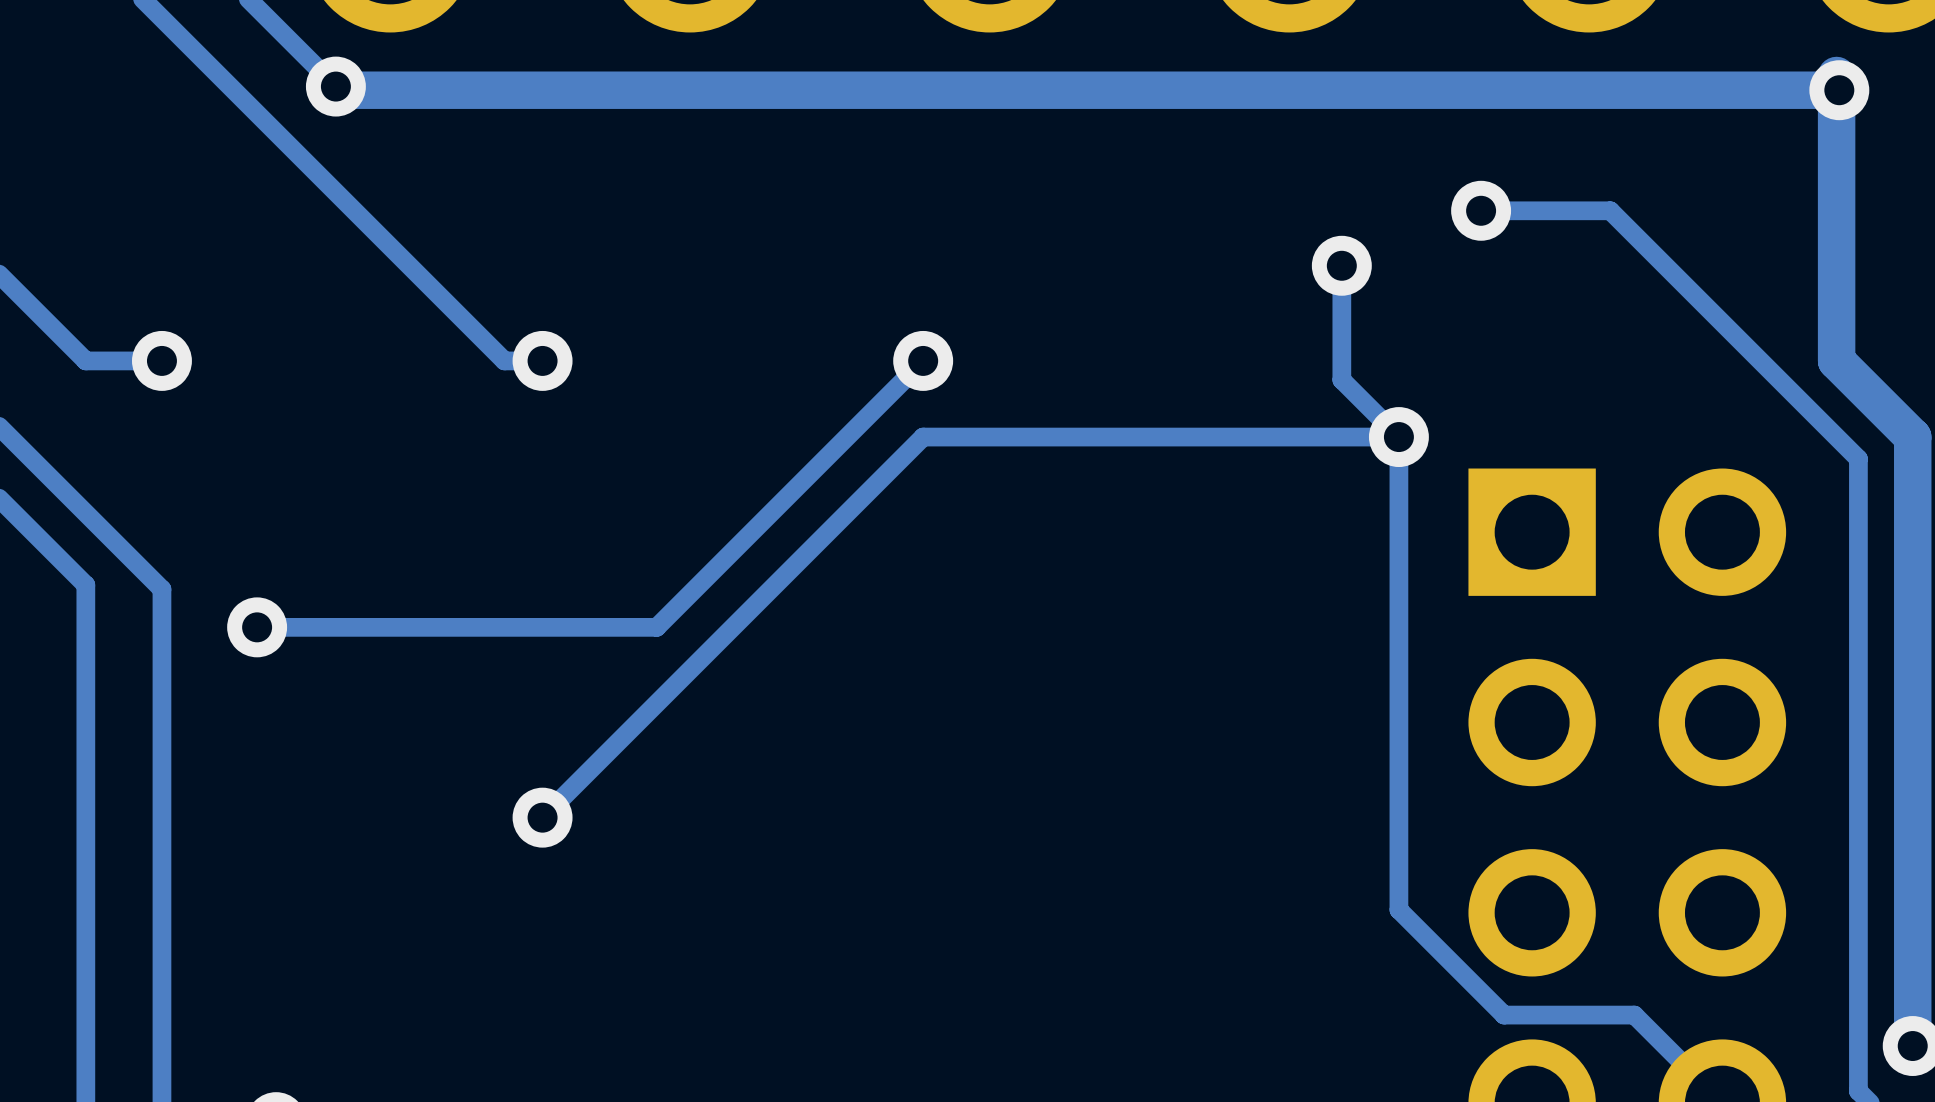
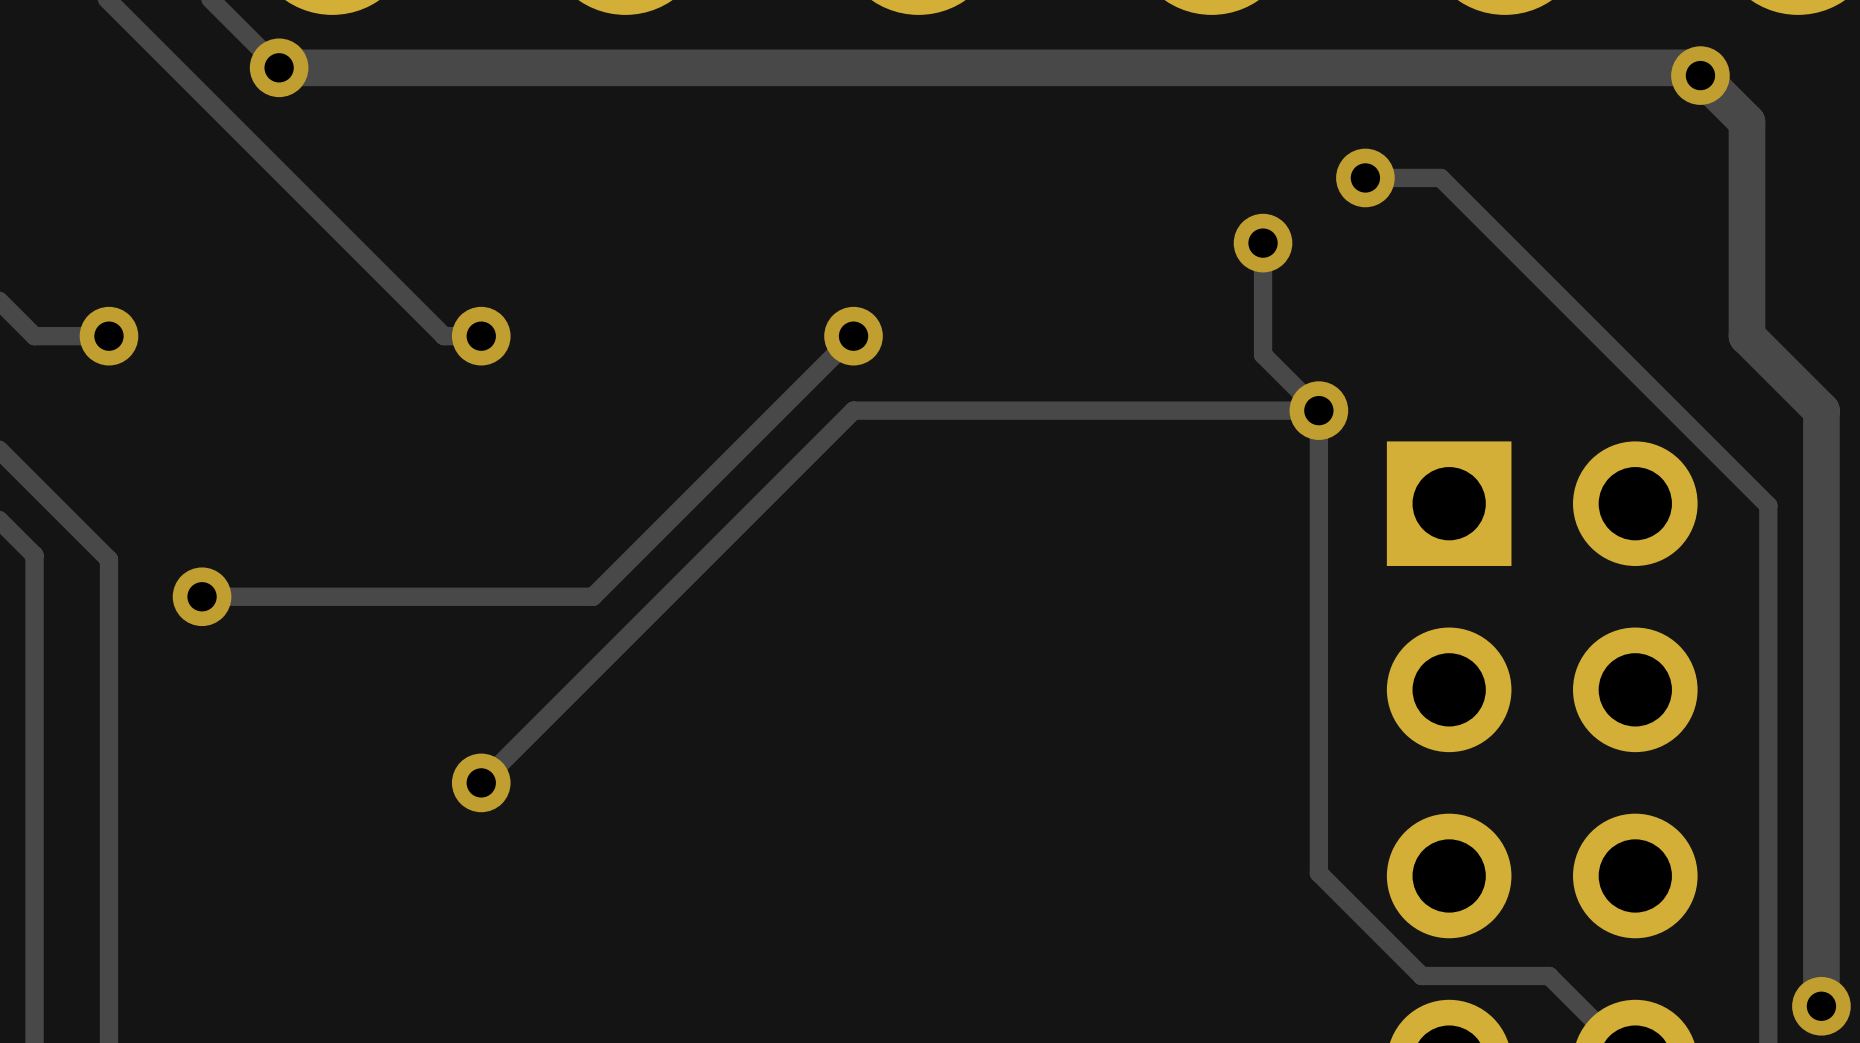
track: (335, 86) (339, 90) (1839, 90) (1839, 78) (1836, 75) (1836, 142) -> (279, 67) (1692, 67) (1746, 122)
via position: (1839, 90) -> (1700, 75)
track: (1481, 210) (1610, 210) (1858, 458) (1858, 534) -> (1365, 177) (1440, 177) (1768, 505)
via position: (1481, 210) -> (1365, 177)

